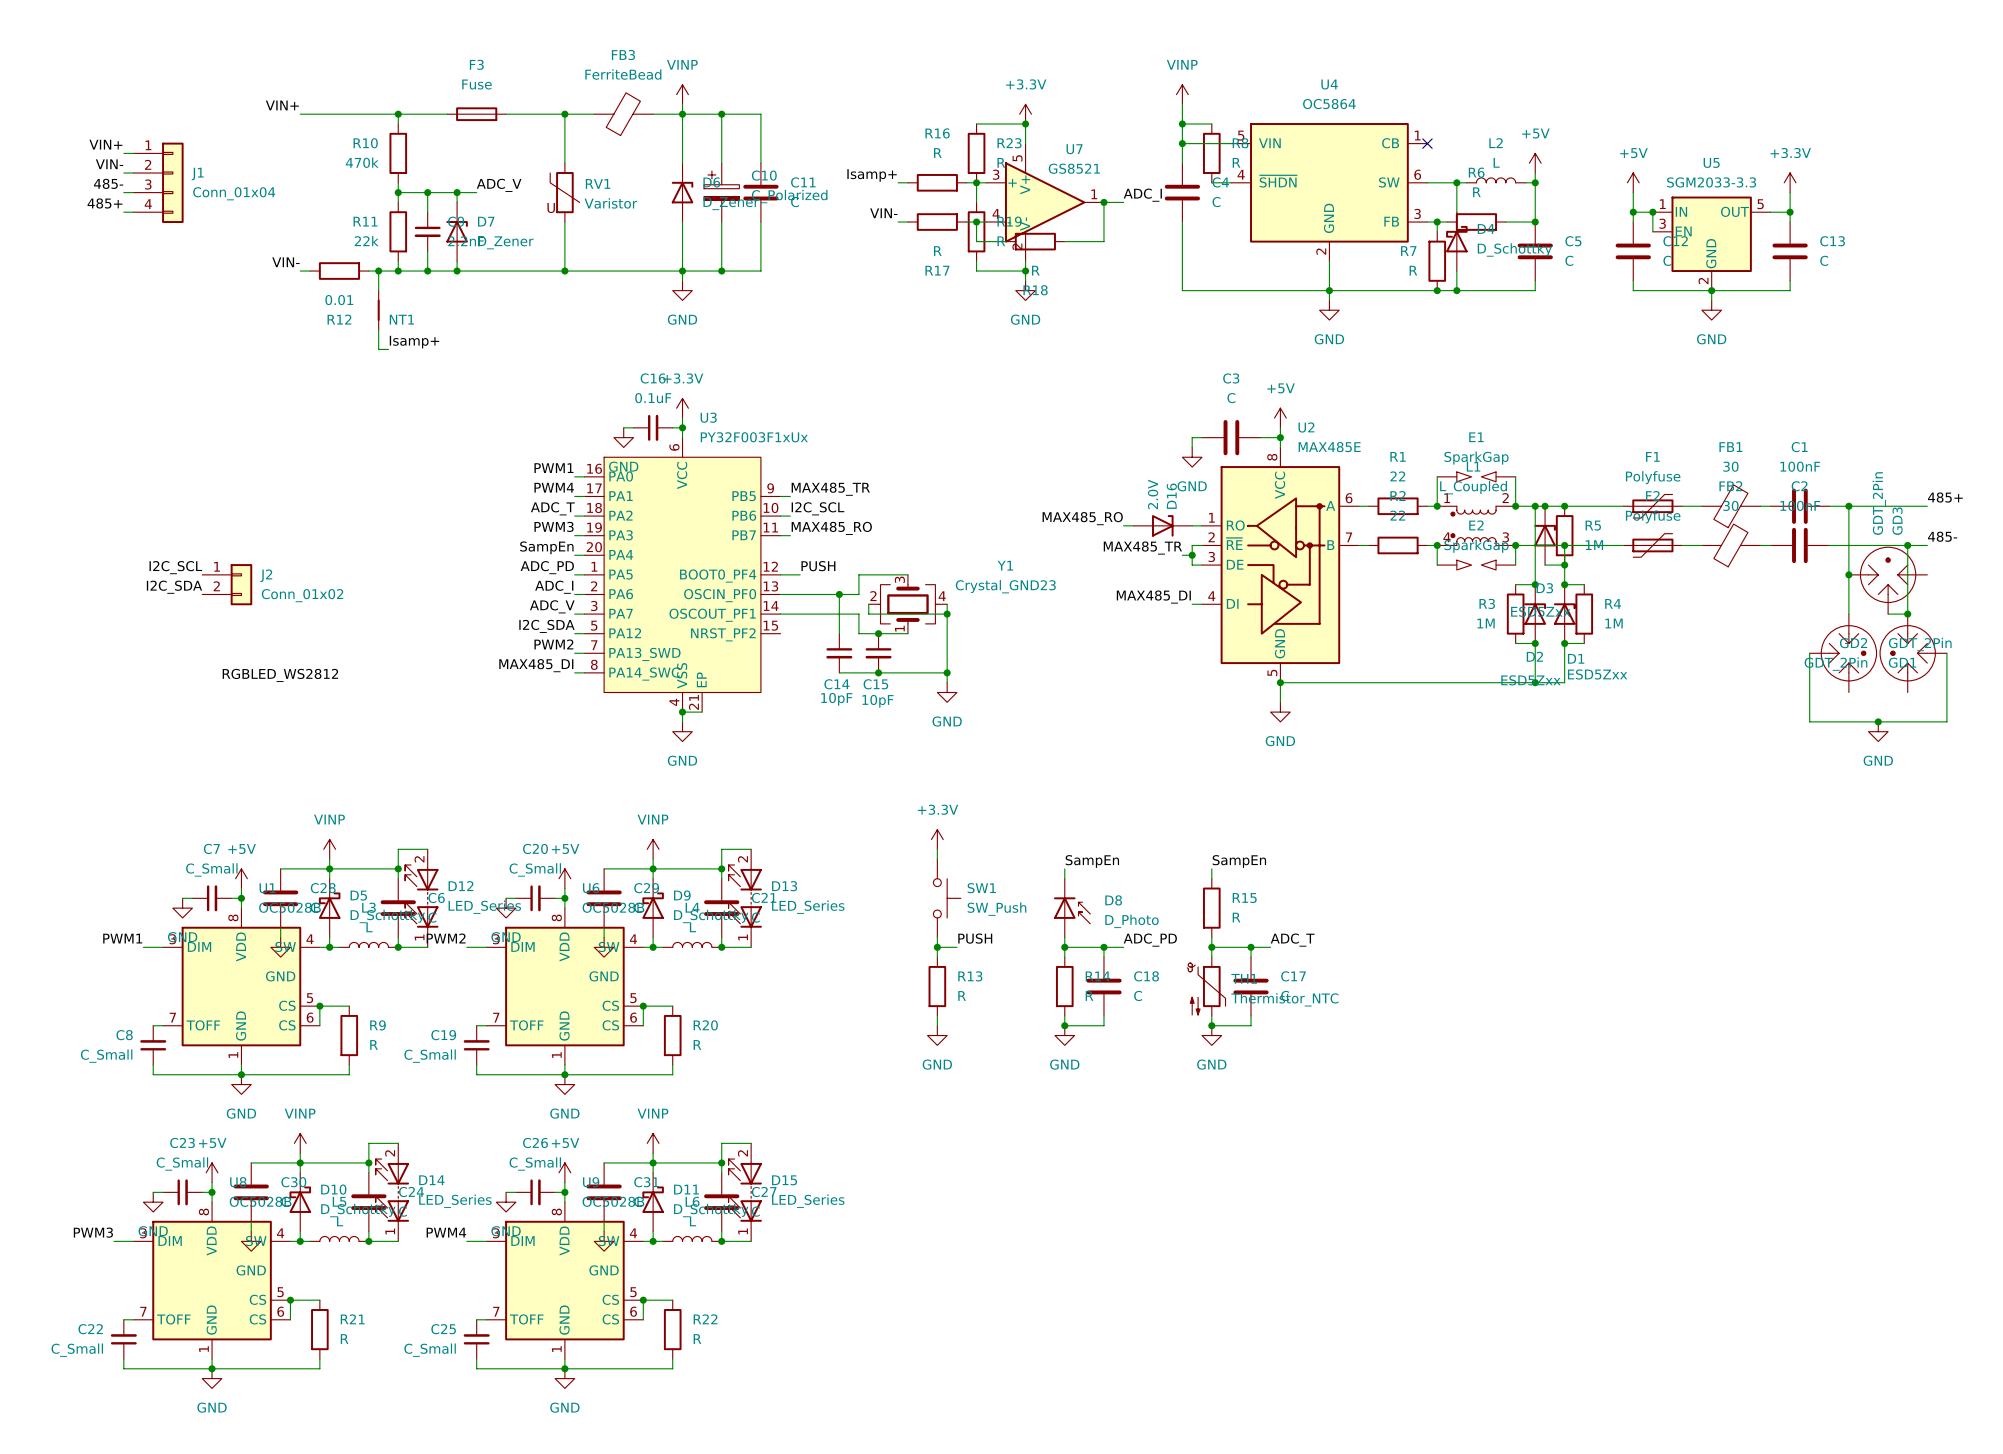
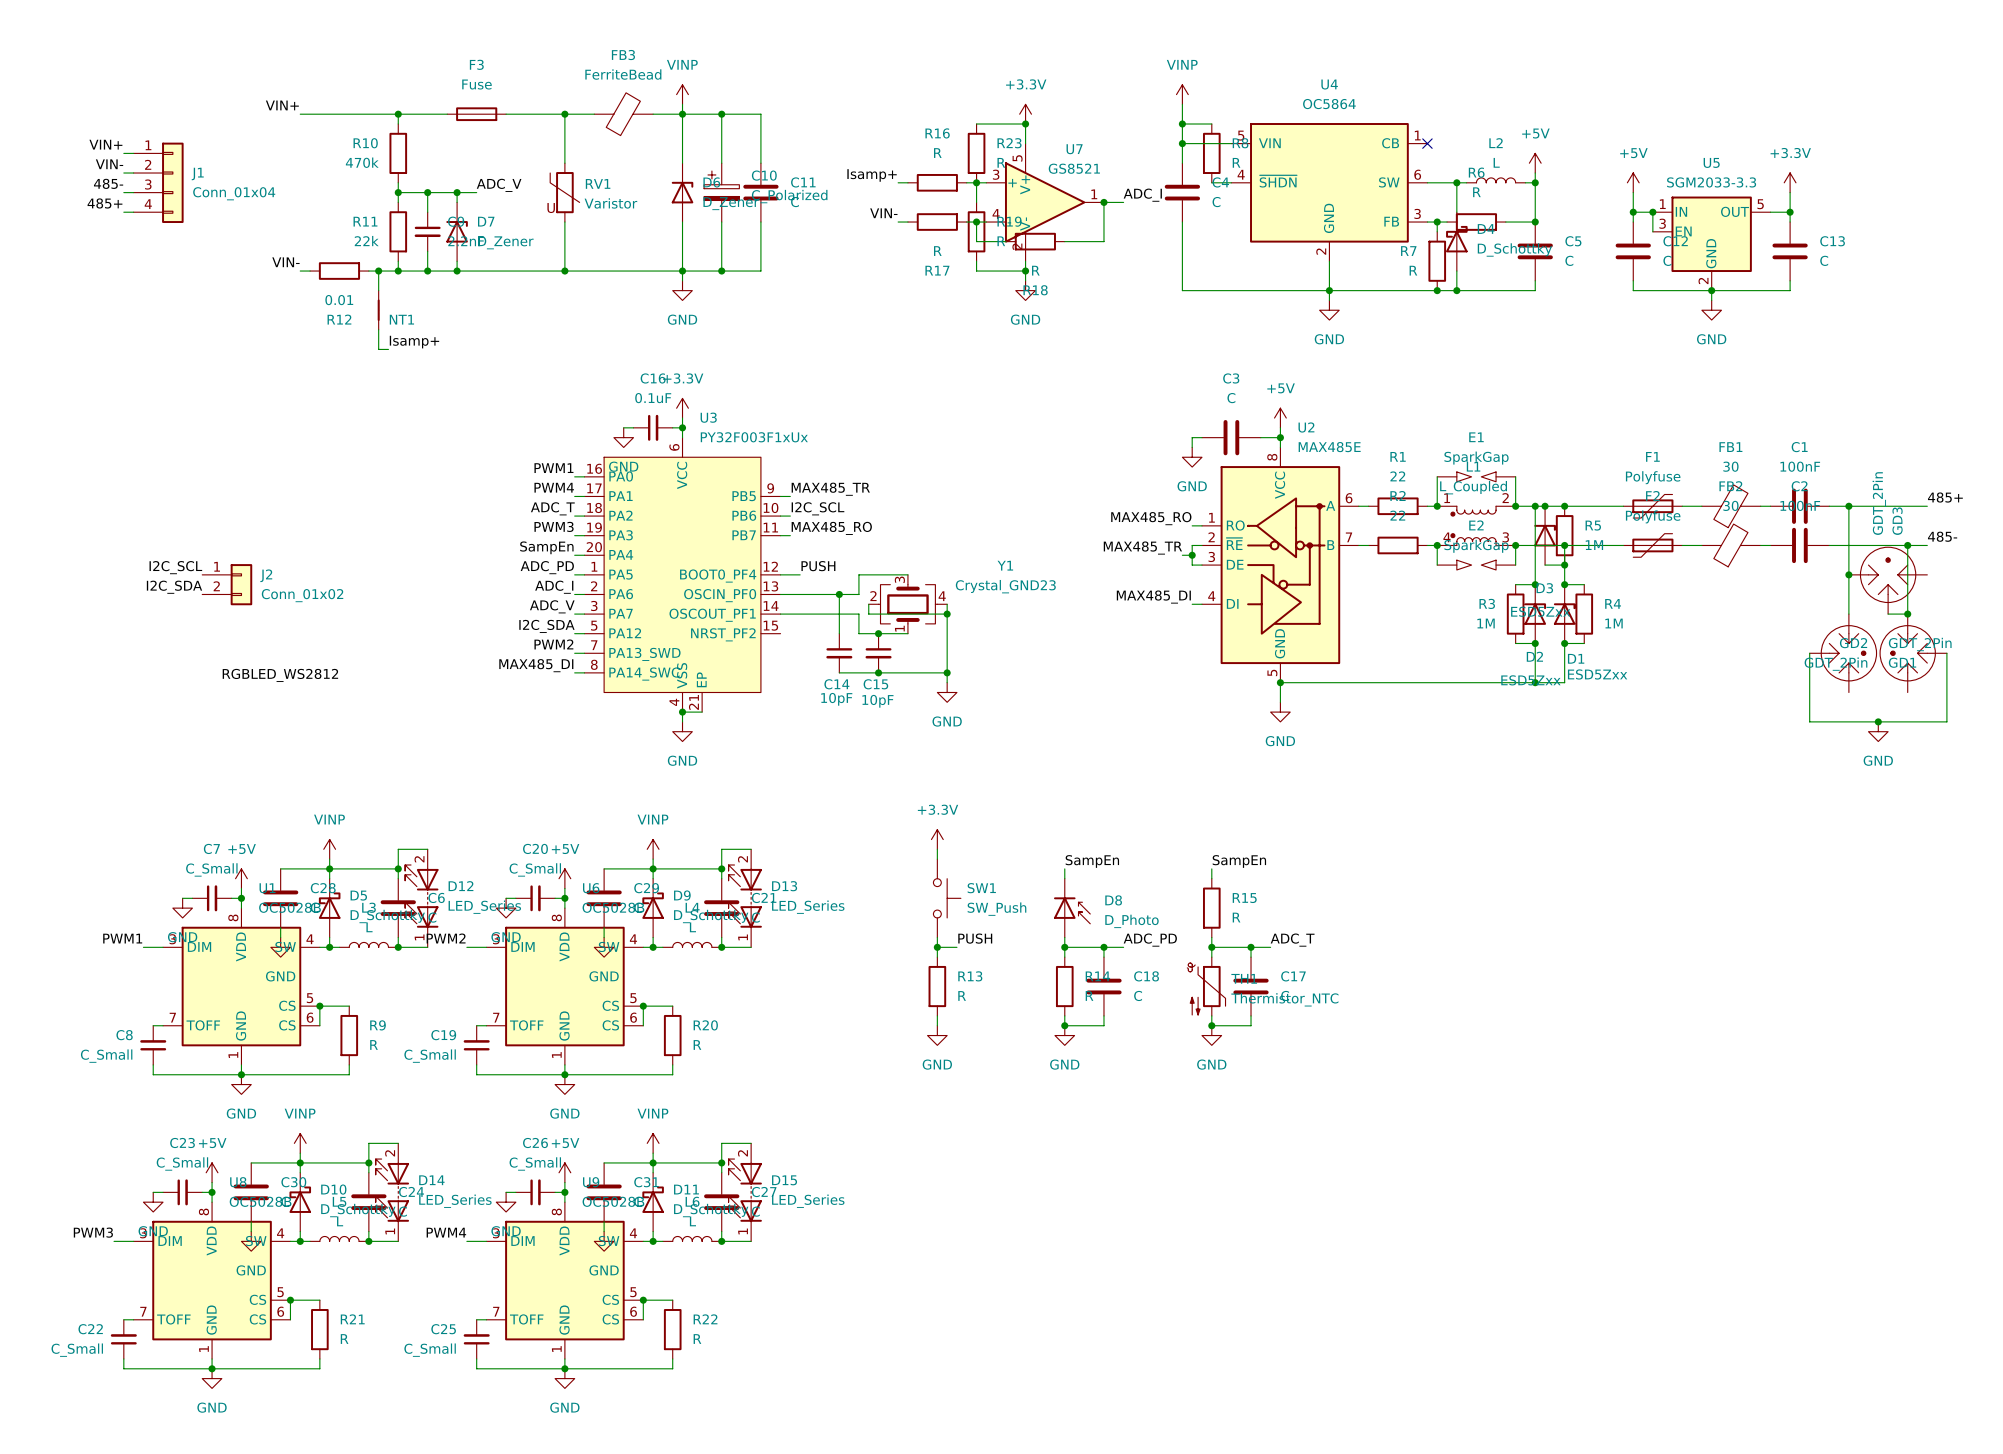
label position: MAX485_RO (1082, 518) -> MAX485_RO (1151, 518)
wire: (1123, 525) (1133, 525) -> none
D16: 2.0V (1162, 525) -> none

